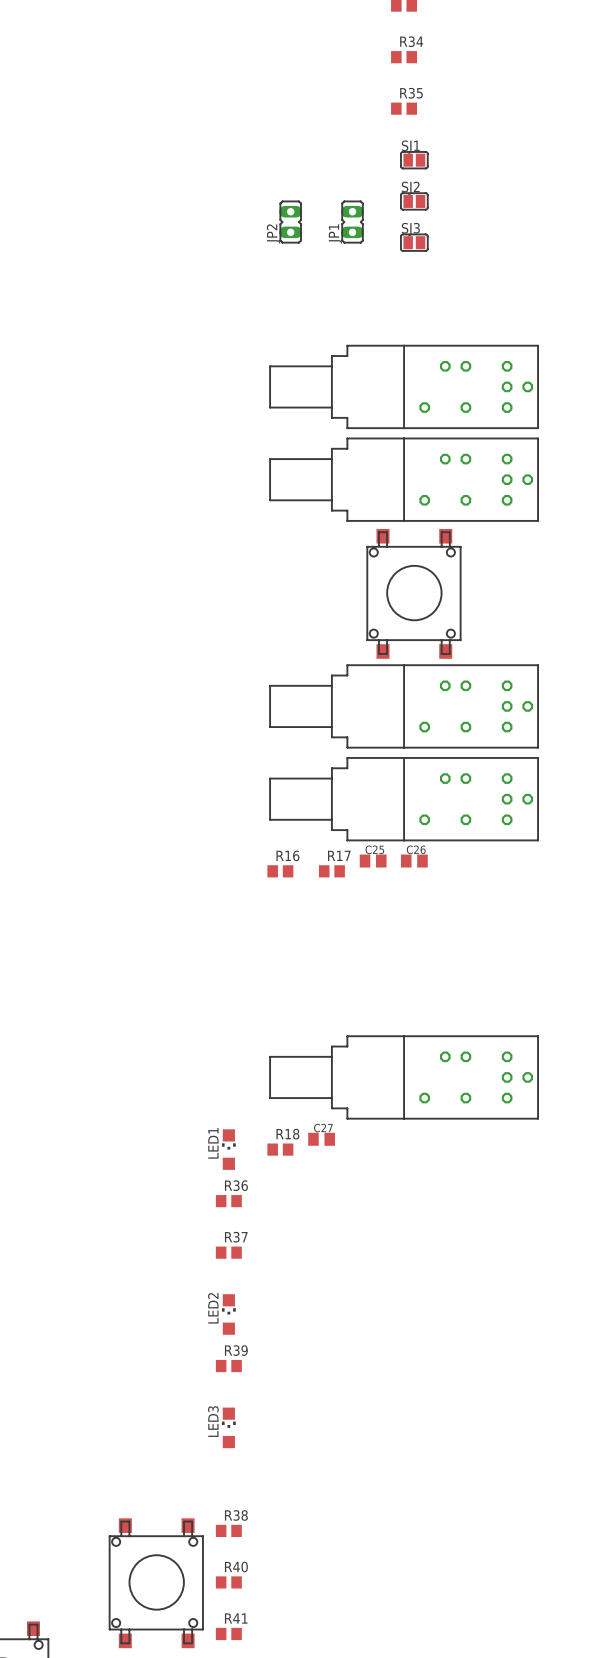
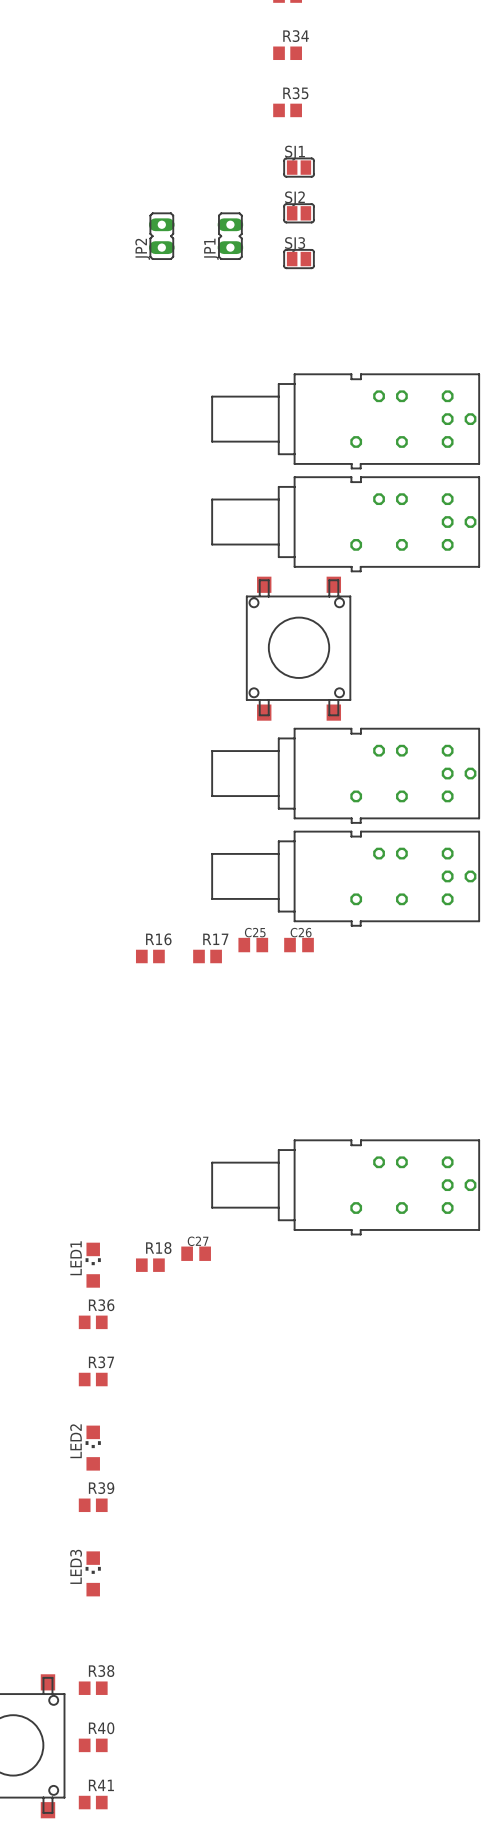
part: (404, 386) -> none
part: none -> (345, 421)
part: (404, 479) -> none
part: none -> (345, 524)
part: (404, 706) -> none
part: none -> (345, 775)
part: (404, 799) -> none
part: none -> (345, 878)
part: (404, 1077) -> none
part: none -> (345, 1187)

